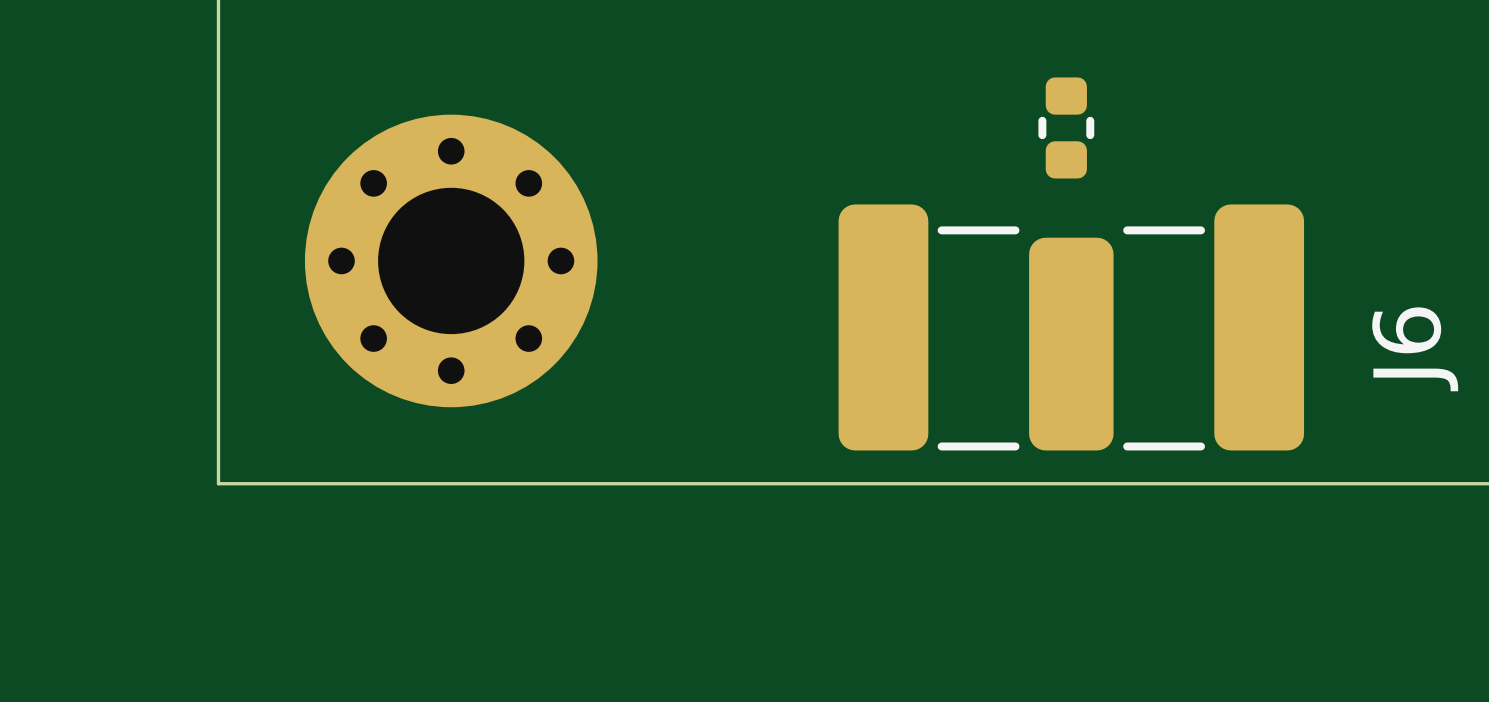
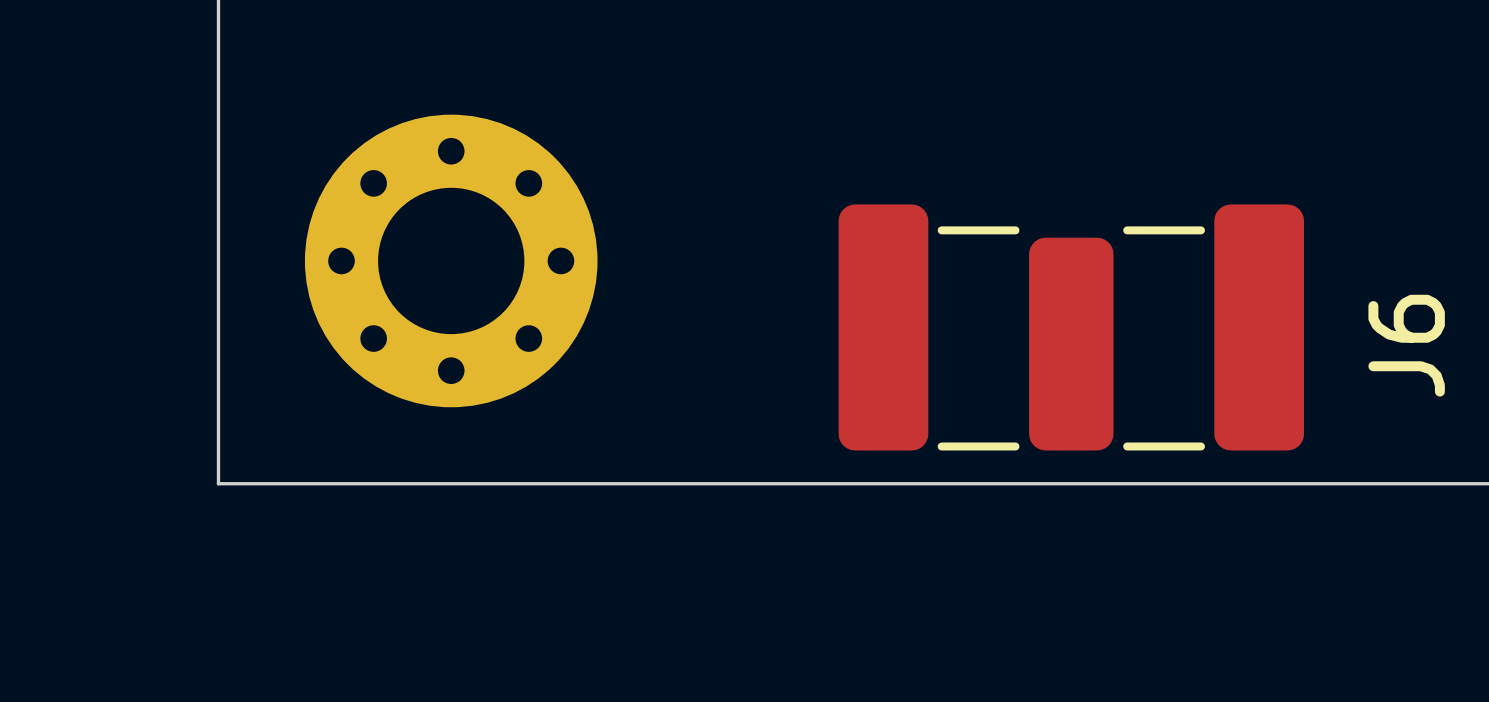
part: (1066, 127) -> none

